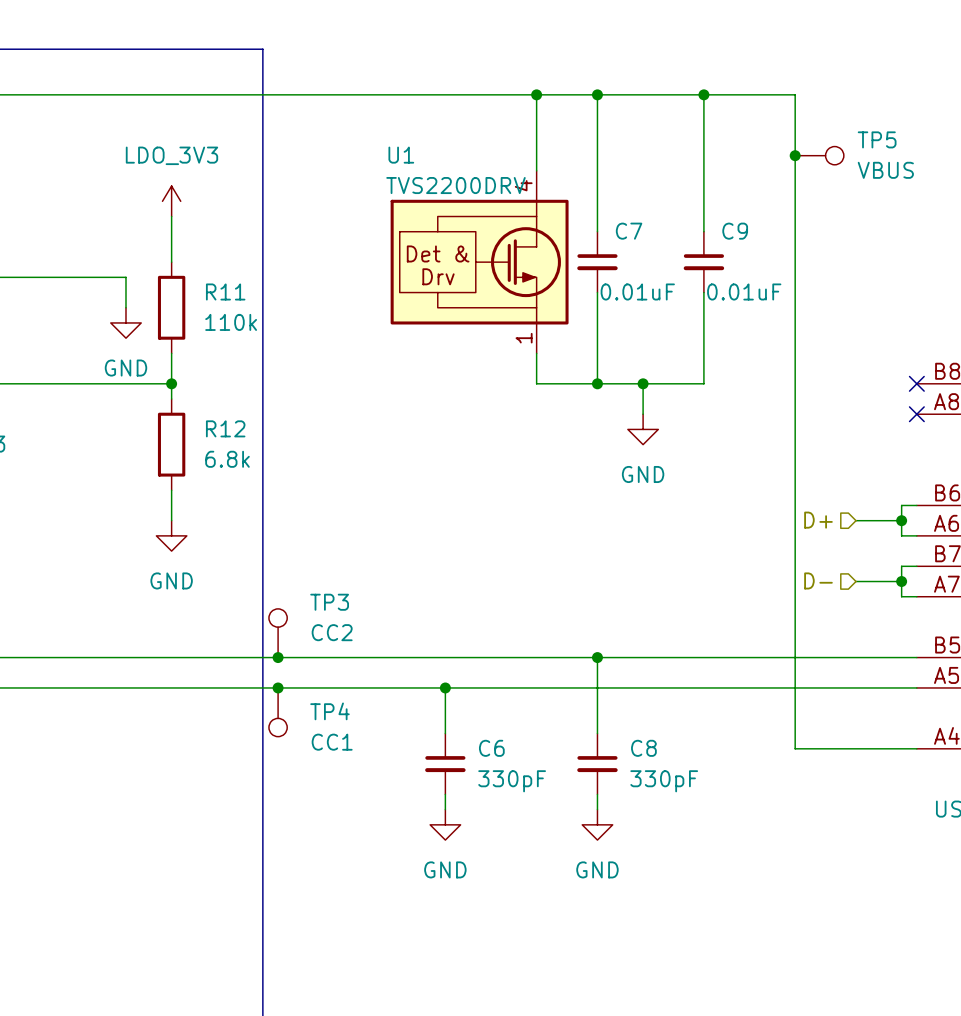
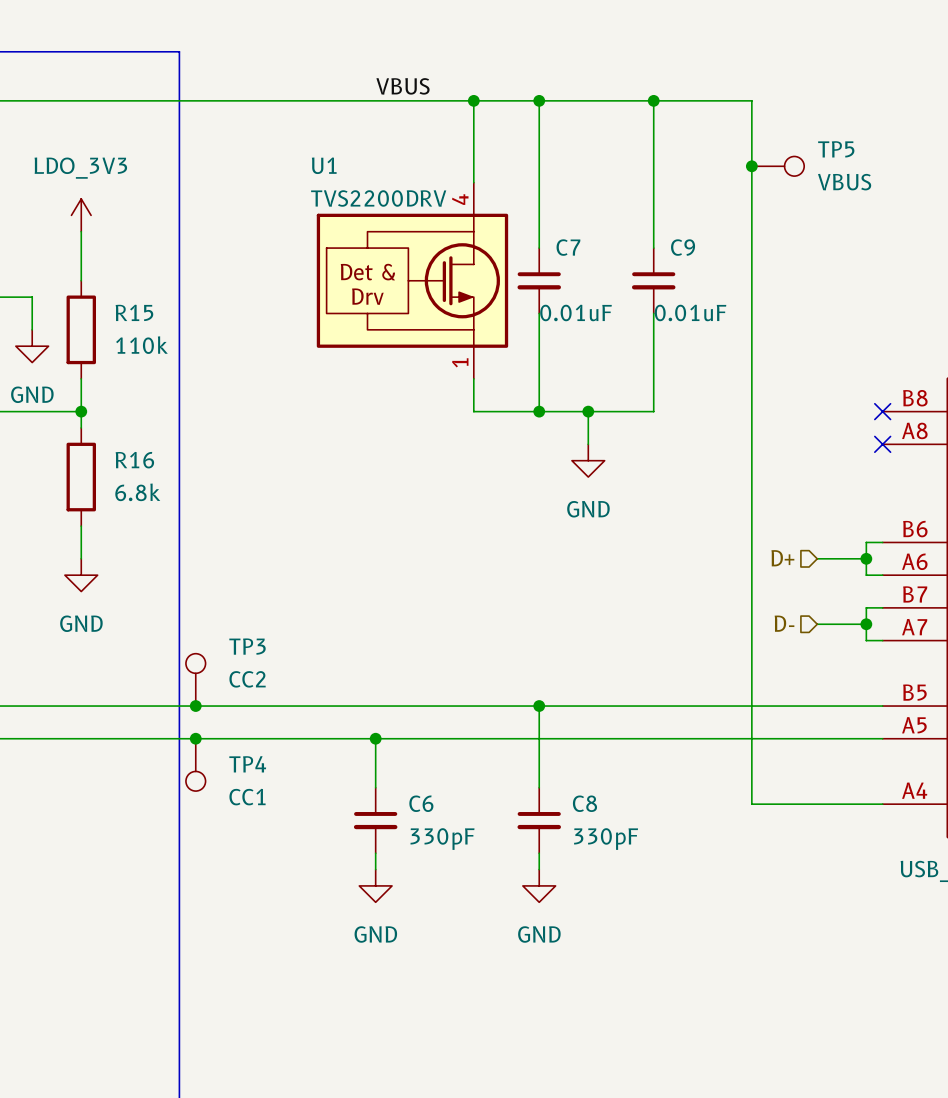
label: none -> VBUS (402, 86)
R11 name: R11 (225, 291) -> R15 (134, 312)
R12 name: R12 (225, 428) -> R16 (134, 460)

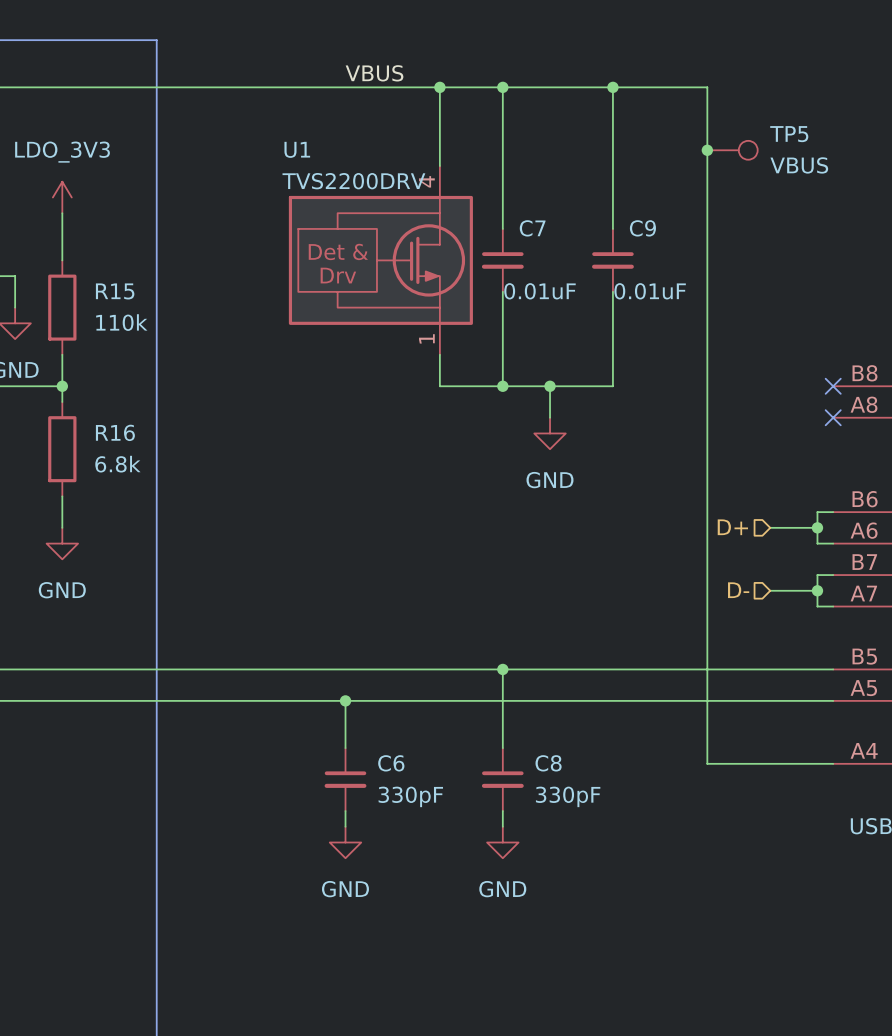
TP3: CC2 (195, 679) -> none
junction: (195, 706) -> none
junction: (195, 738) -> none
TP4: CC1 (195, 764) -> none

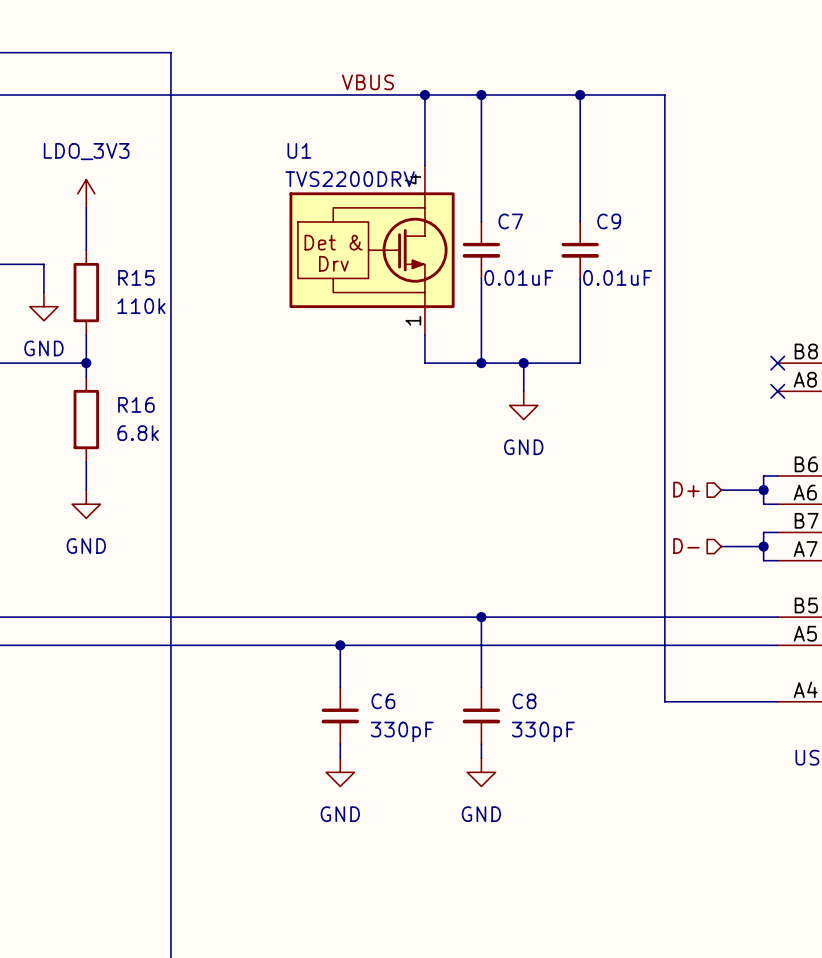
junction: (707, 150) -> none
TP5: VBUS (732, 150) -> none

